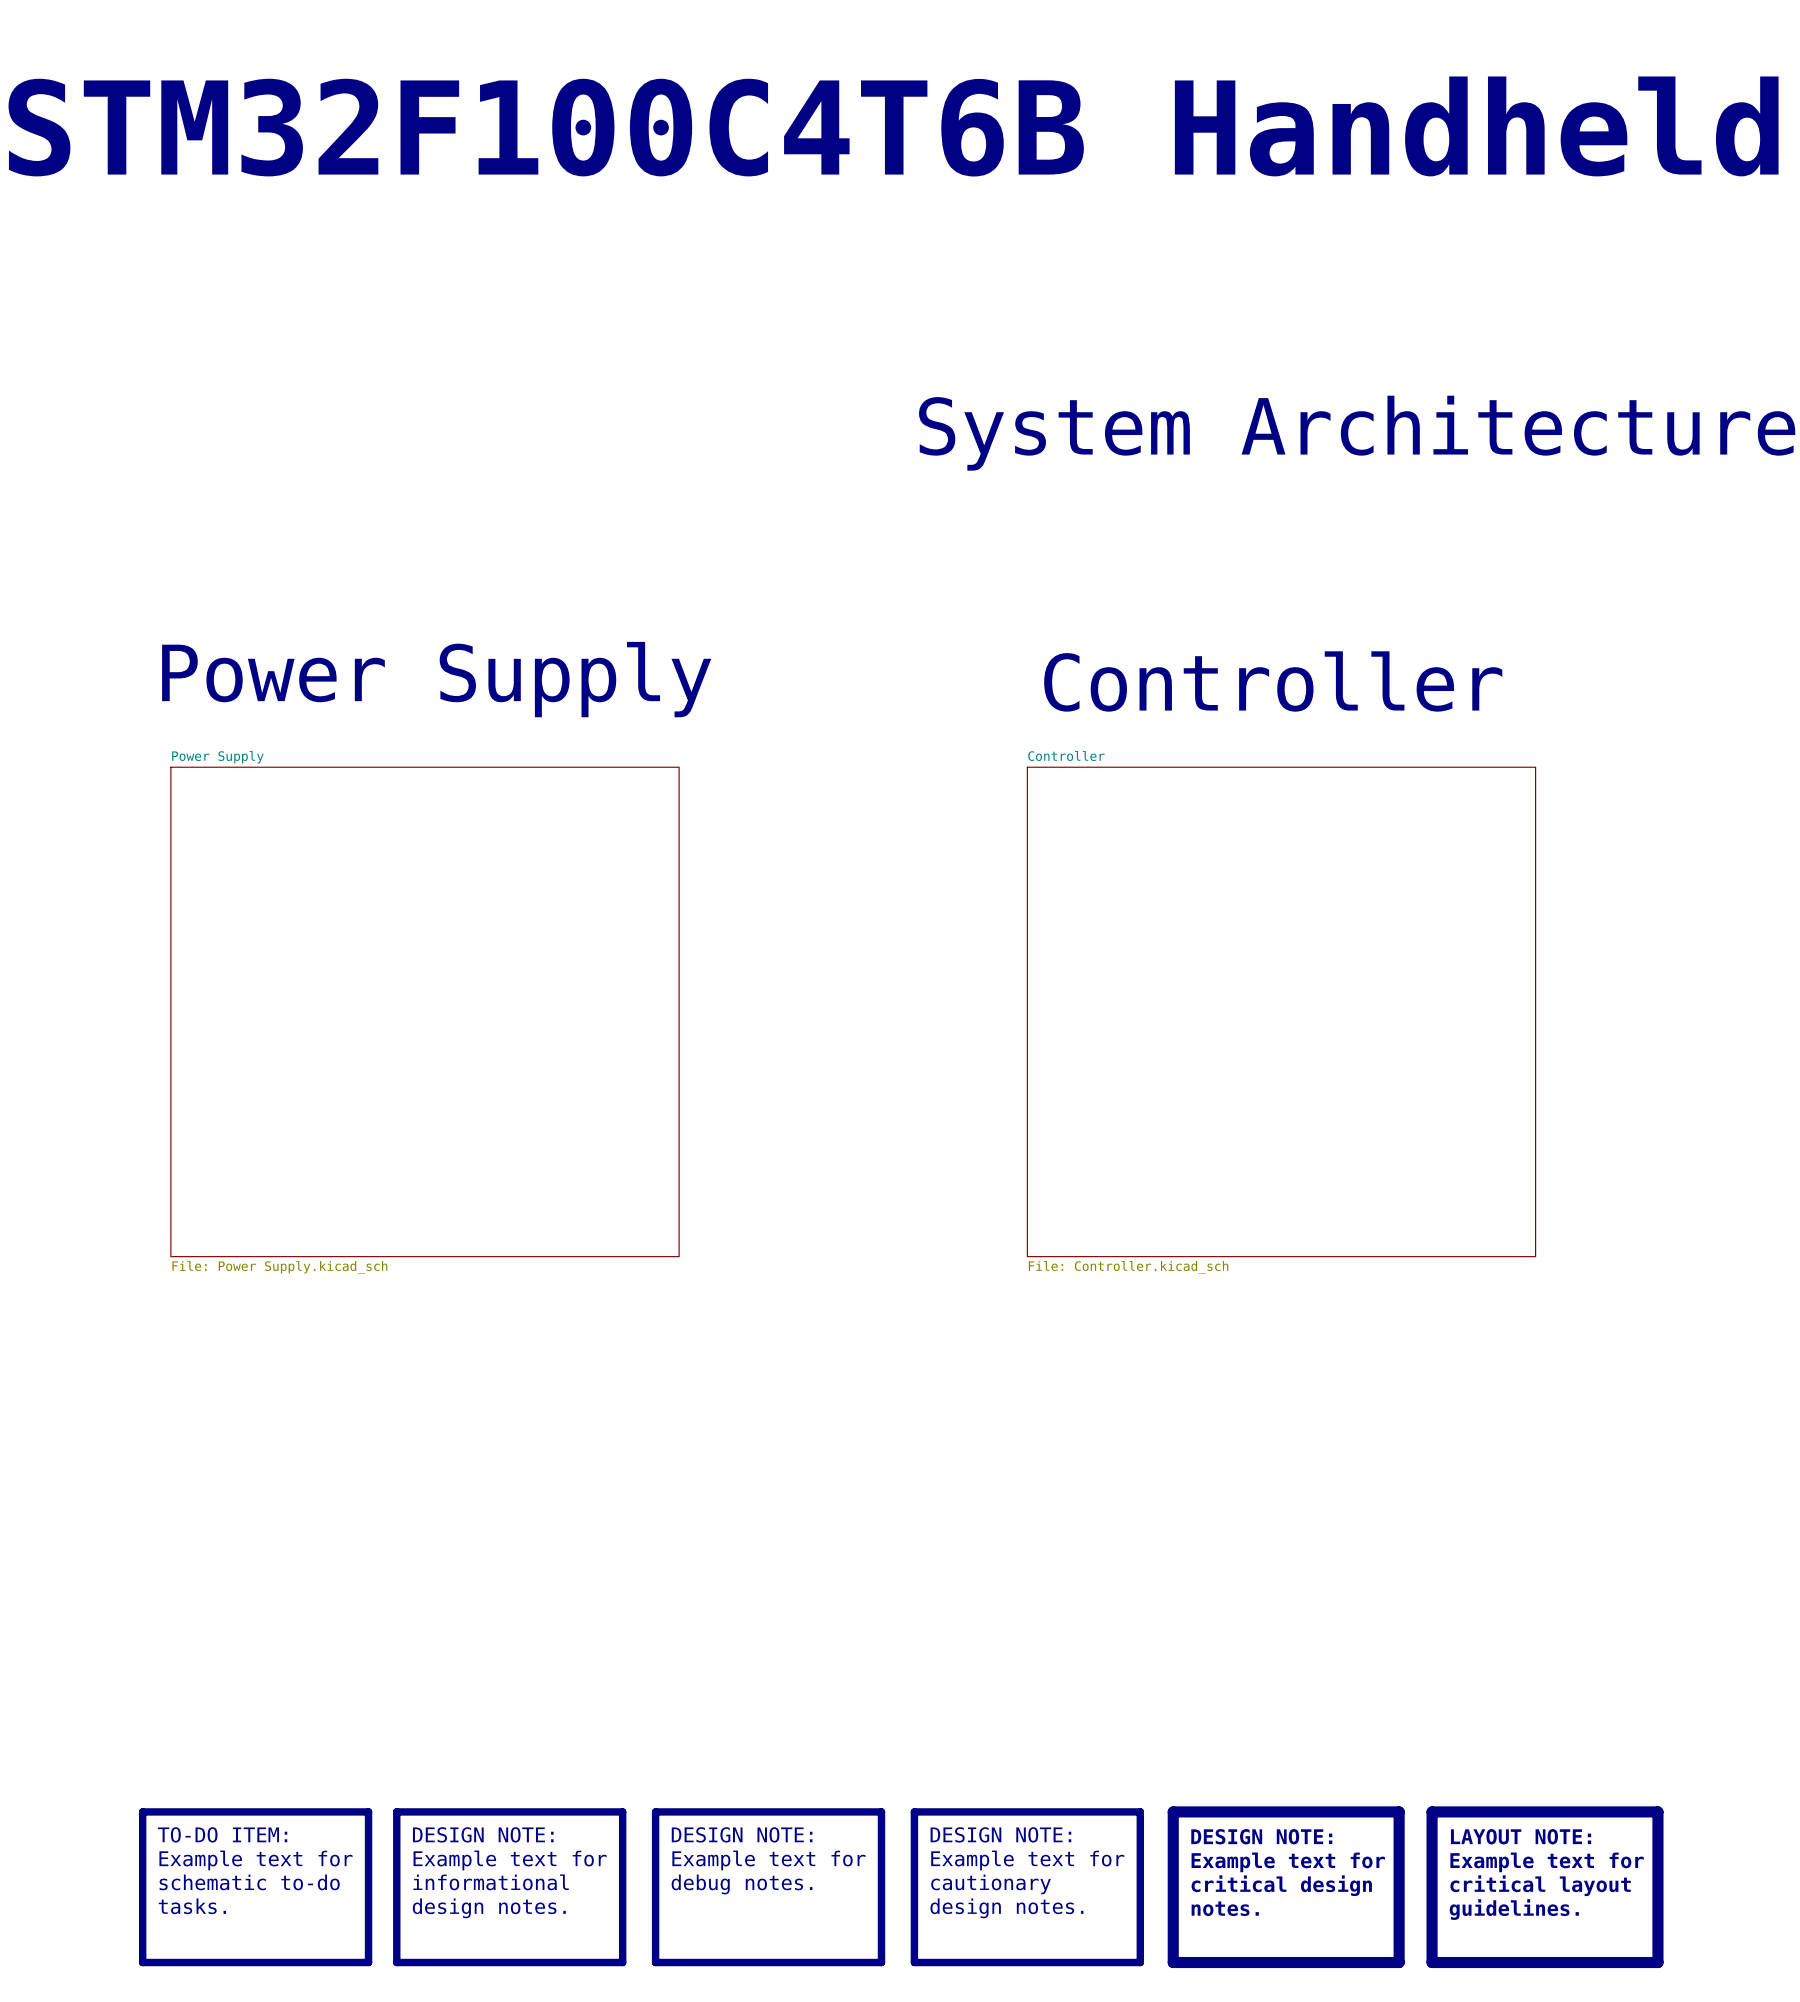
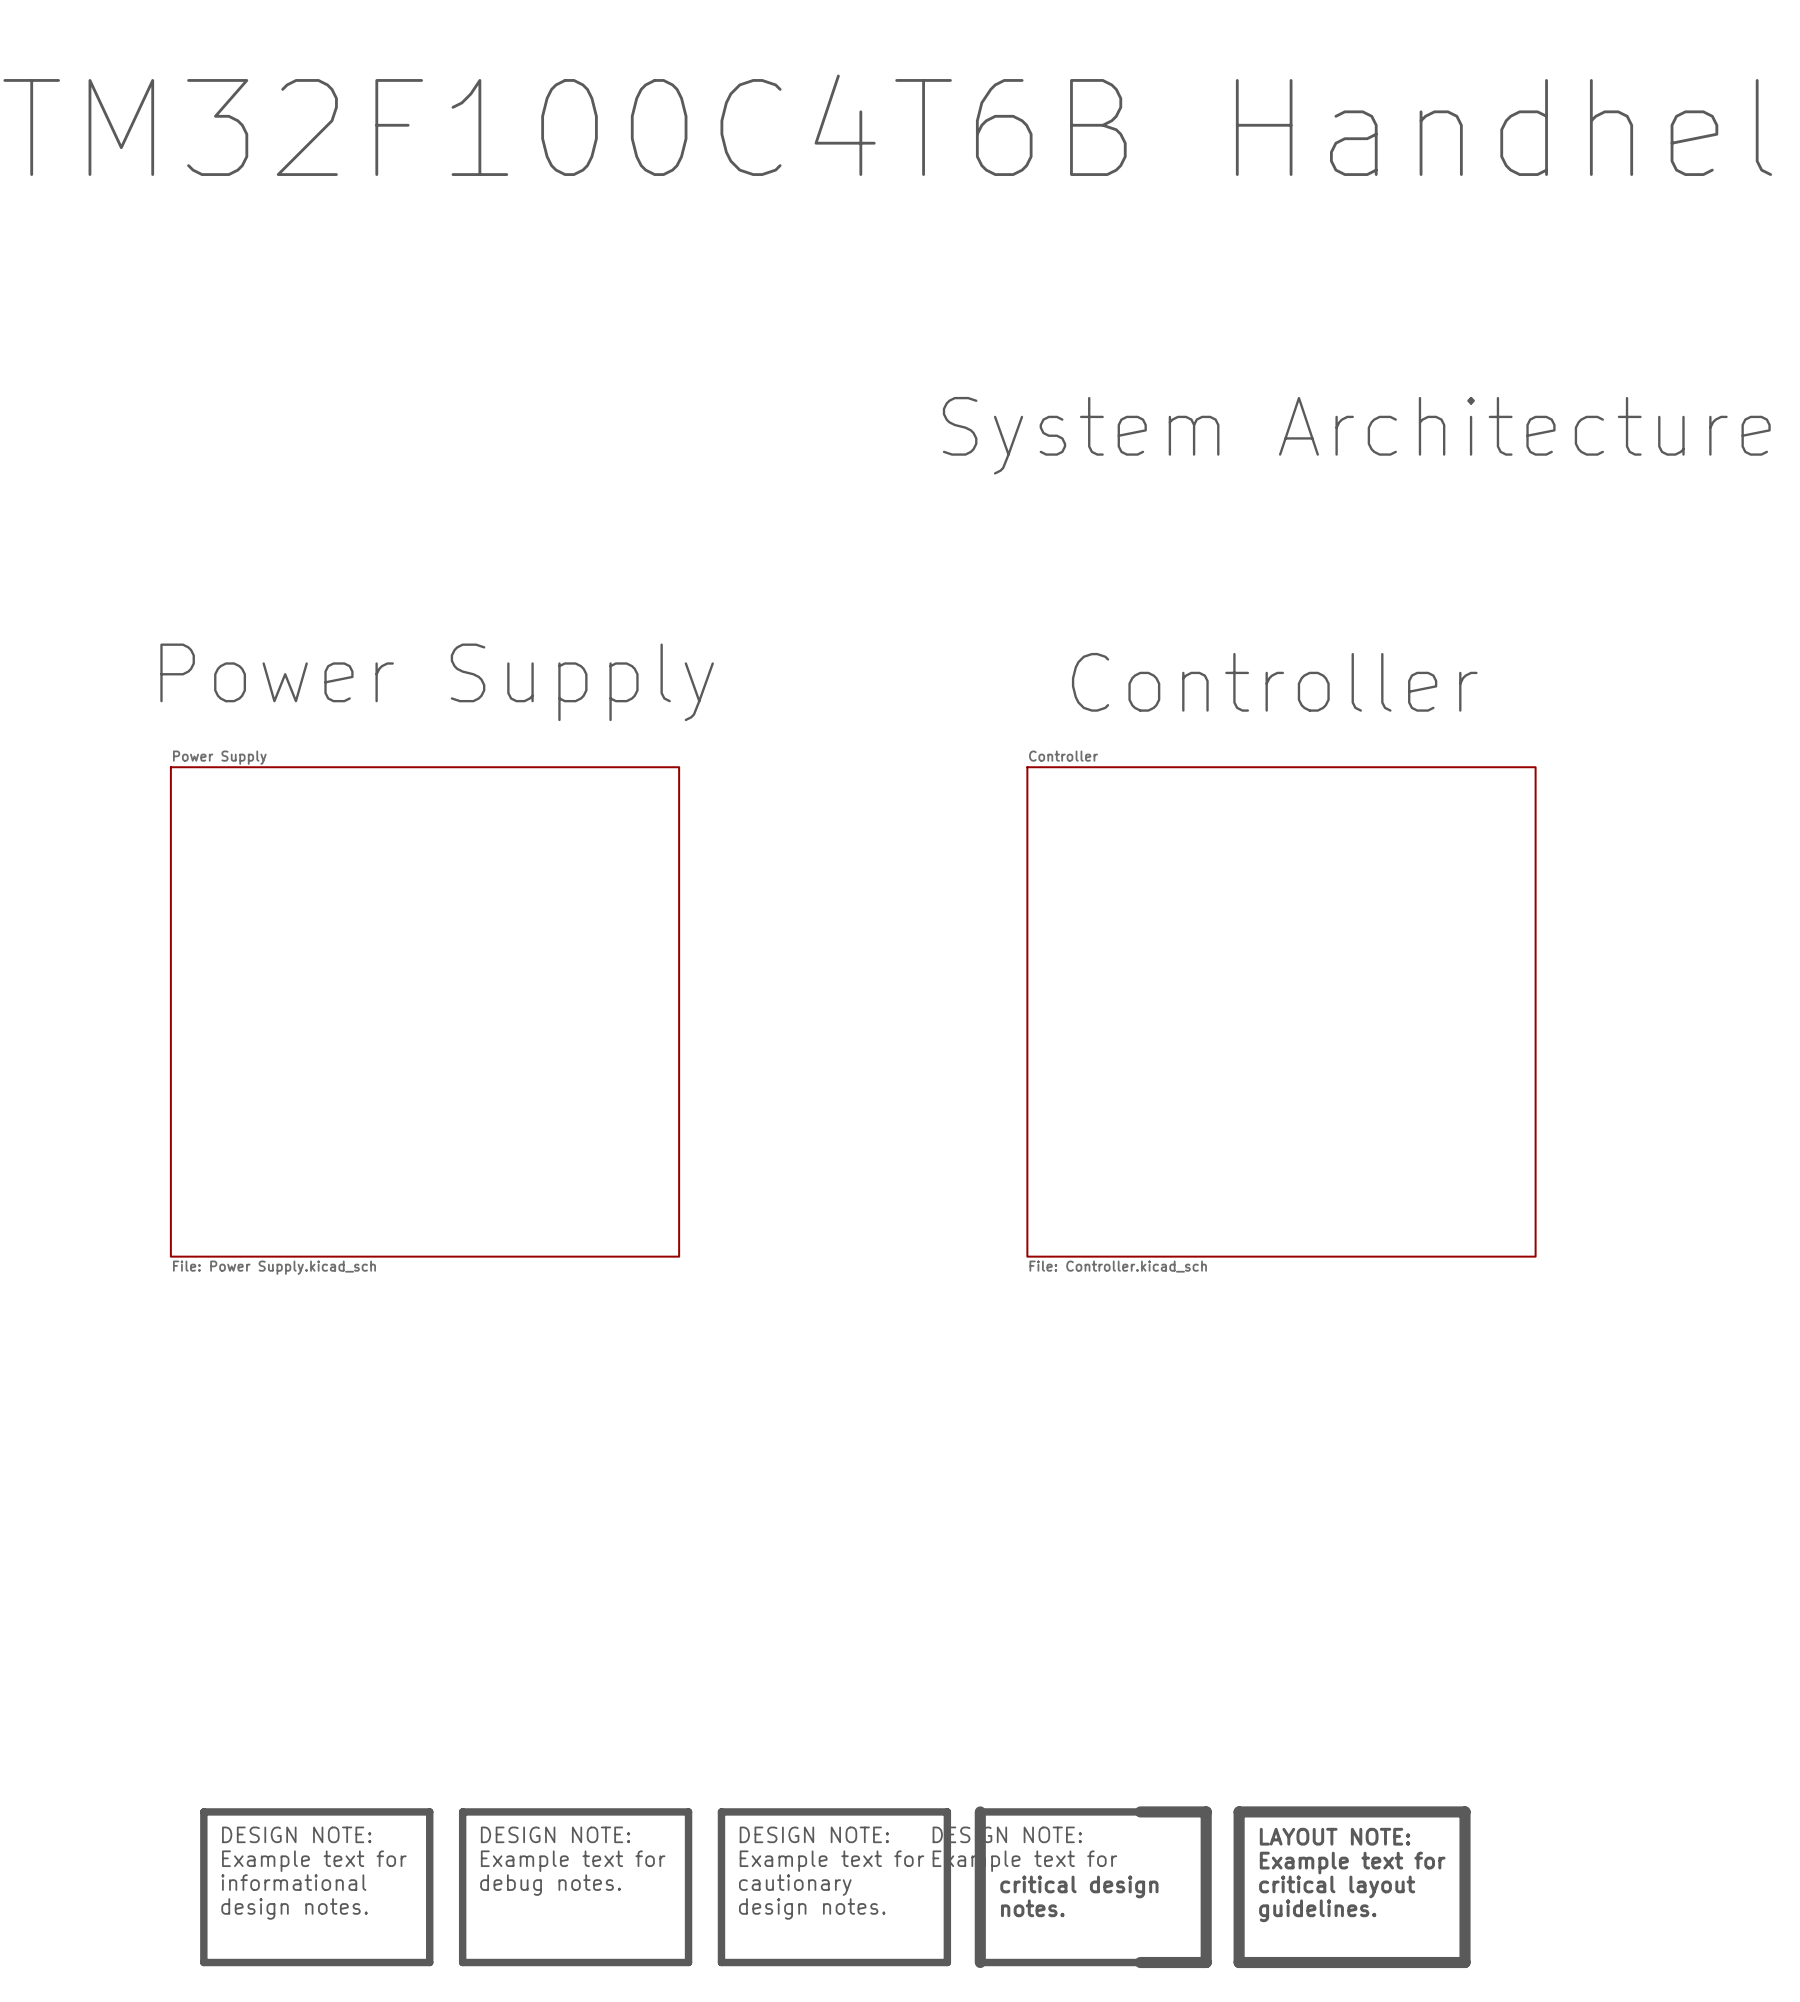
line: (203, 1811) (142, 1811) (142, 1962) (203, 1962) -> (203, 1811) (203, 1962)
line: (368, 1811) (368, 1962) -> (368, 1811) (396, 1811)
line: (396, 1811) (396, 1962) -> (368, 1962) (396, 1962)
line: (429, 1811) (462, 1811) -> (429, 1811) (429, 1962)
line: (622, 1811) (622, 1962) -> (622, 1811) (655, 1811)
line: (655, 1811) (655, 1962) -> (622, 1962) (655, 1962)
line: (688, 1811) (721, 1811) -> (688, 1811) (688, 1962)
line: (881, 1811) (881, 1962) -> (881, 1811) (914, 1811)
line: (914, 1811) (914, 1962) -> (881, 1962) (914, 1962)
line: (947, 1811) (980, 1811) -> (947, 1811) (947, 1962)
line: (1140, 1811) (1140, 1962) -> (1140, 1811) (1173, 1811)
line: (1173, 1811) (1173, 1962) -> (1140, 1962) (1173, 1962)
line: (1206, 1811) (1239, 1811) -> (1206, 1811) (1206, 1962)
line: (1399, 1811) (1399, 1962) -> (1399, 1811) (1432, 1811)
line: (1432, 1811) (1432, 1962) -> (1399, 1962) (1432, 1962)
line: (1465, 1811) (1657, 1811) (1657, 1962) (1465, 1962) -> (1465, 1811) (1465, 1962)
text: TO-DO ITEM: (222, 1834) -> none
text: none -> DESIGN NOTE: (296, 1834)
text position: DESIGN NOTE: (483, 1834) -> DESIGN NOTE: (555, 1834)
text position: DESIGN NOTE: (742, 1834) -> DESIGN NOTE: (814, 1834)
text: DESIGN NOTE: (1261, 1836) -> none
text: none -> LAYOUT NOTE: (1335, 1836)
text: LAYOUT NOTE: (1521, 1836) -> none
text position: Example text for (255, 1860) -> Example text for (314, 1861)
text position: Example text for (510, 1860) -> Example text for (573, 1861)
text position: Example text for (768, 1860) -> Example text for (831, 1861)
text position: Example text for (1288, 1862) -> Example text for (1352, 1863)
text: Example text for (1547, 1862) -> none
text: schematic to-do (249, 1882) -> none
text: none -> informational (293, 1882)
text: informational (491, 1882) -> none
text: debug notes. (742, 1884) -> design notes. (812, 1908)
text: none -> cautionary (795, 1885)
text: cautionary (991, 1884) -> none
text: none -> critical design (1079, 1886)
text: critical design (1281, 1885) -> none
text: none -> critical layout (1337, 1886)
text: critical layout (1540, 1885) -> none
text: tasks. (192, 1906) -> none
text: none -> design notes. (294, 1908)
text: design notes. (489, 1908) -> debug notes. (550, 1885)
text: design notes. (1006, 1908) -> notes. (1032, 1908)
text: notes. (1225, 1908) -> none
text: none -> guidelines. (1317, 1910)
text: guidelines. (1514, 1909) -> none
line: (429, 1962) (462, 1962) -> (462, 1811) (462, 1962)
line: (688, 1962) (721, 1962) -> (721, 1811) (721, 1962)
line: (947, 1962) (980, 1962) -> (980, 1811) (980, 1962)
line: (1206, 1962) (1239, 1962) -> (1239, 1811) (1239, 1962)

